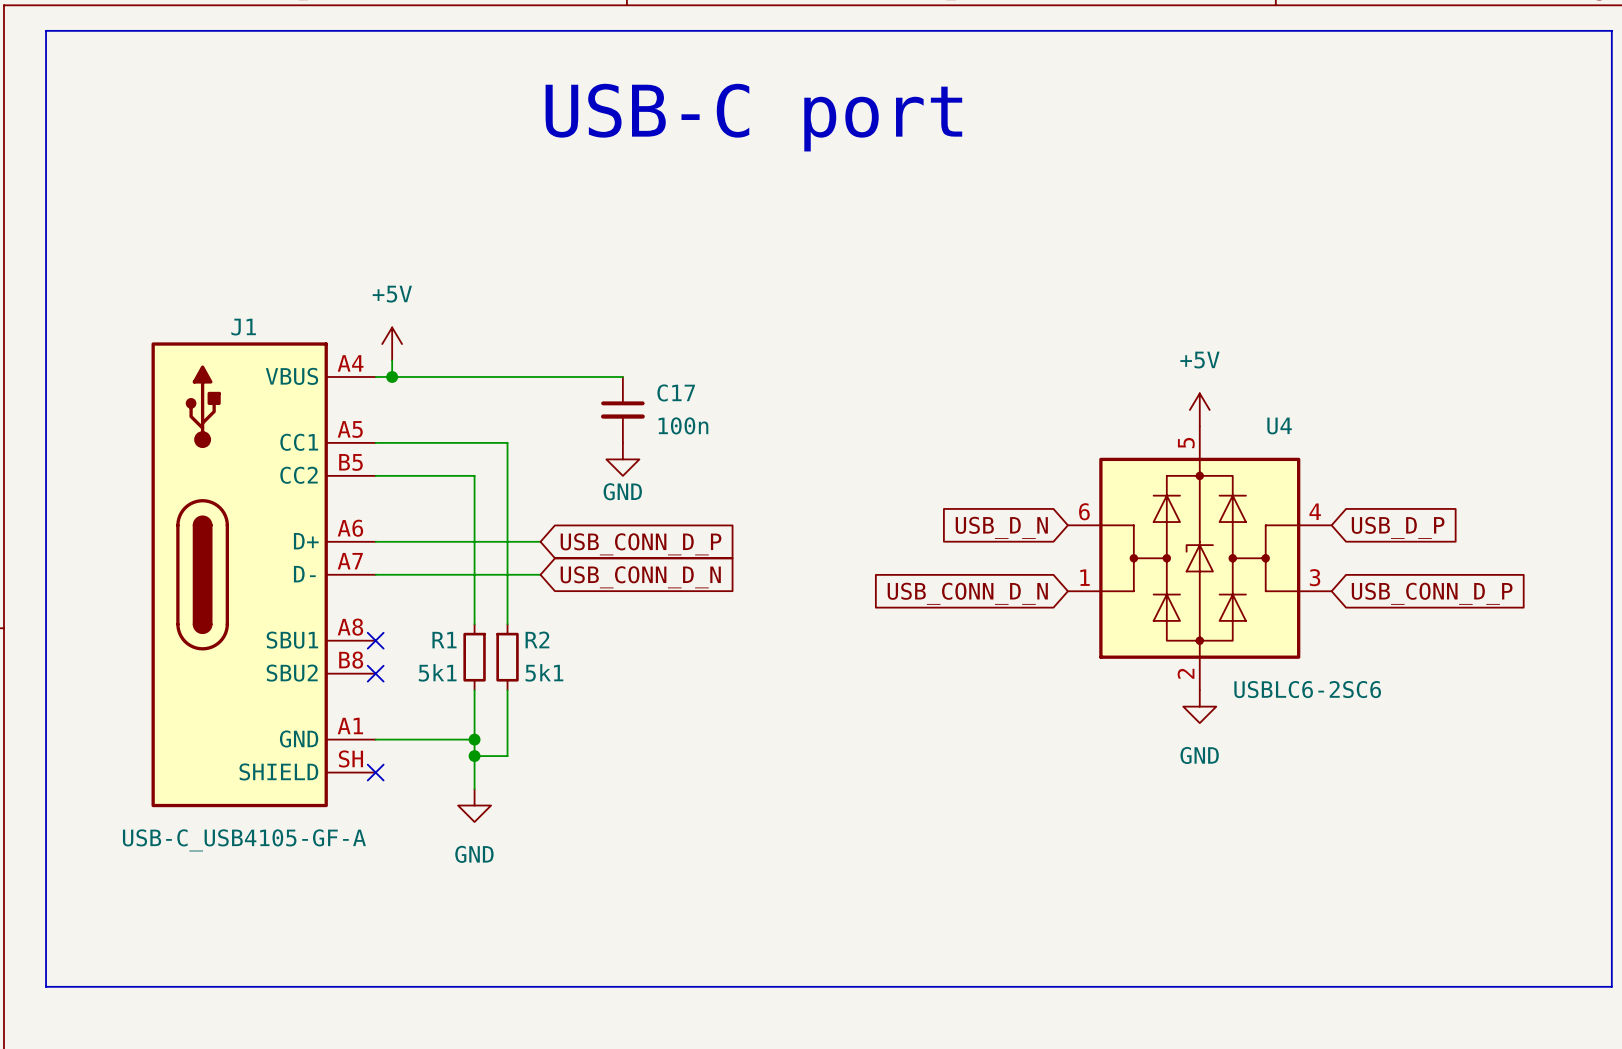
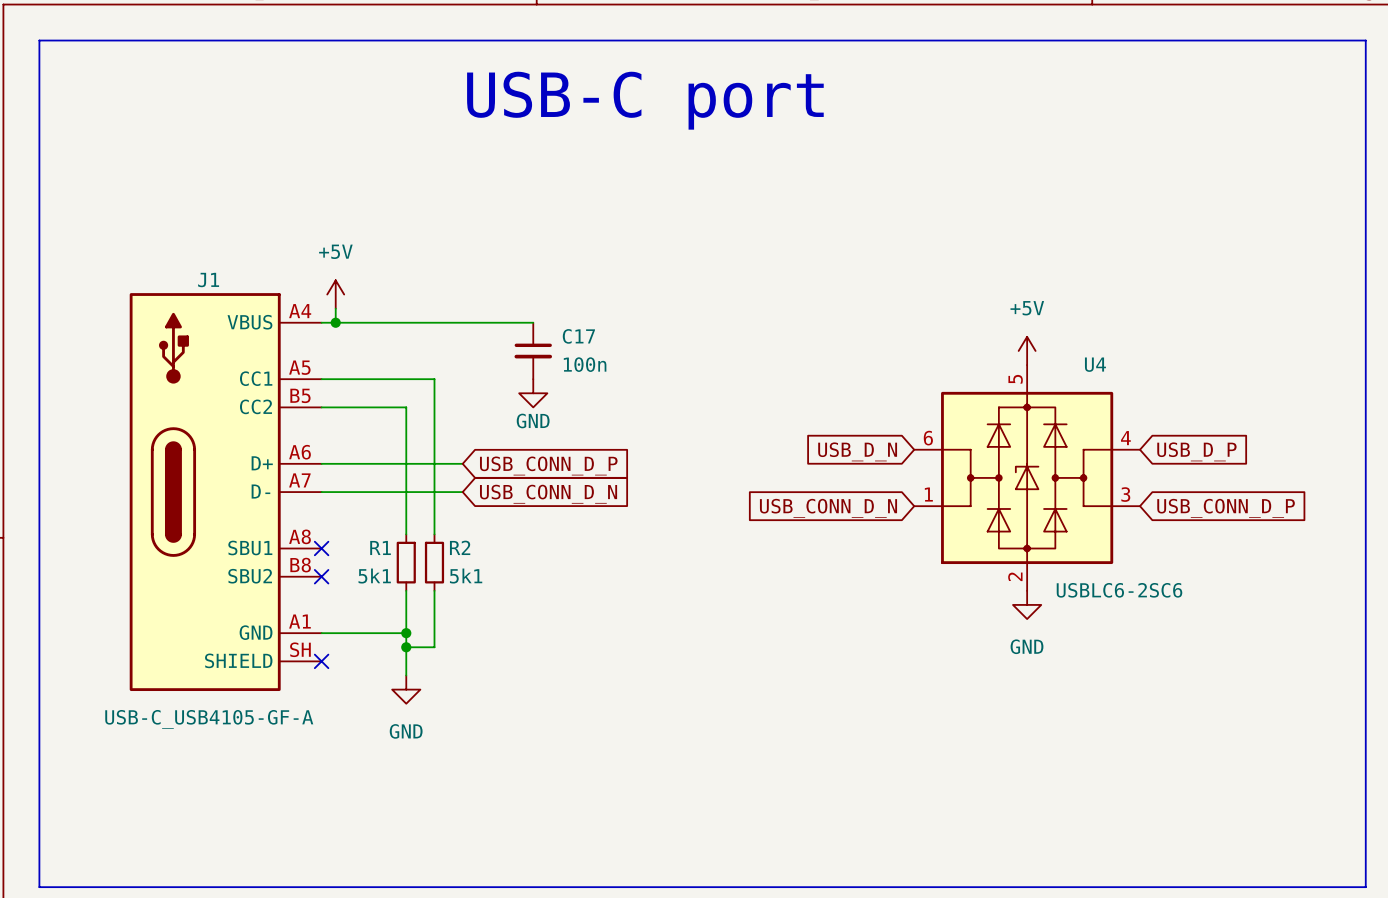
line: (46, 47) (46, 30) (1611, 30) (1611, 986) (46, 986) -> (39, 40) (1365, 40) (1365, 887) (39, 887) (39, 844)

